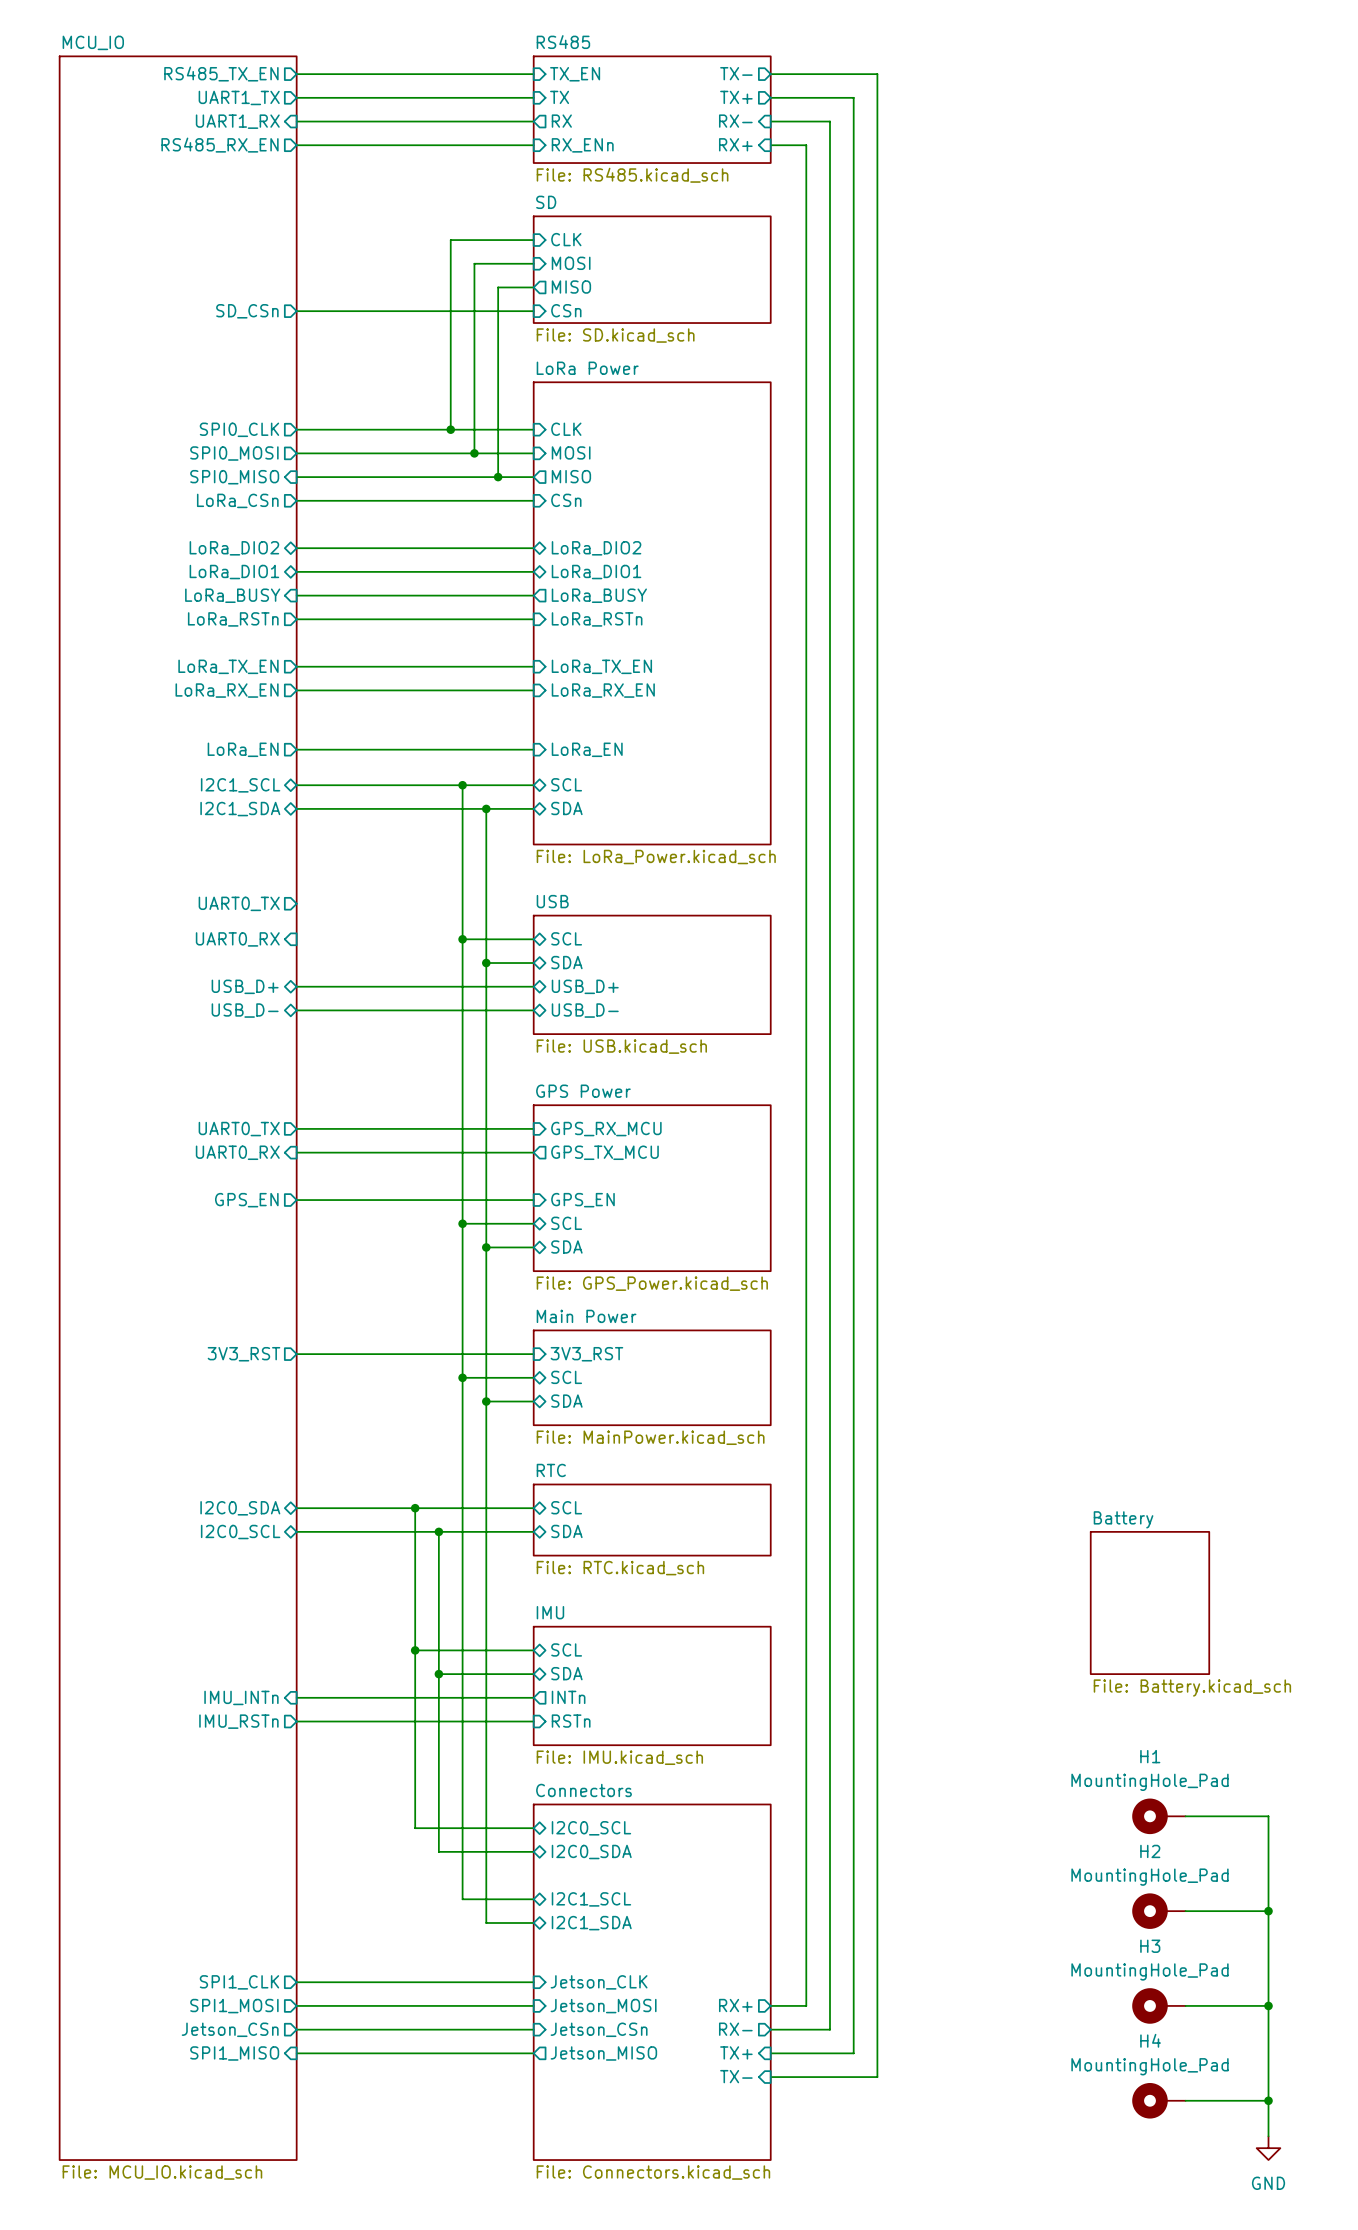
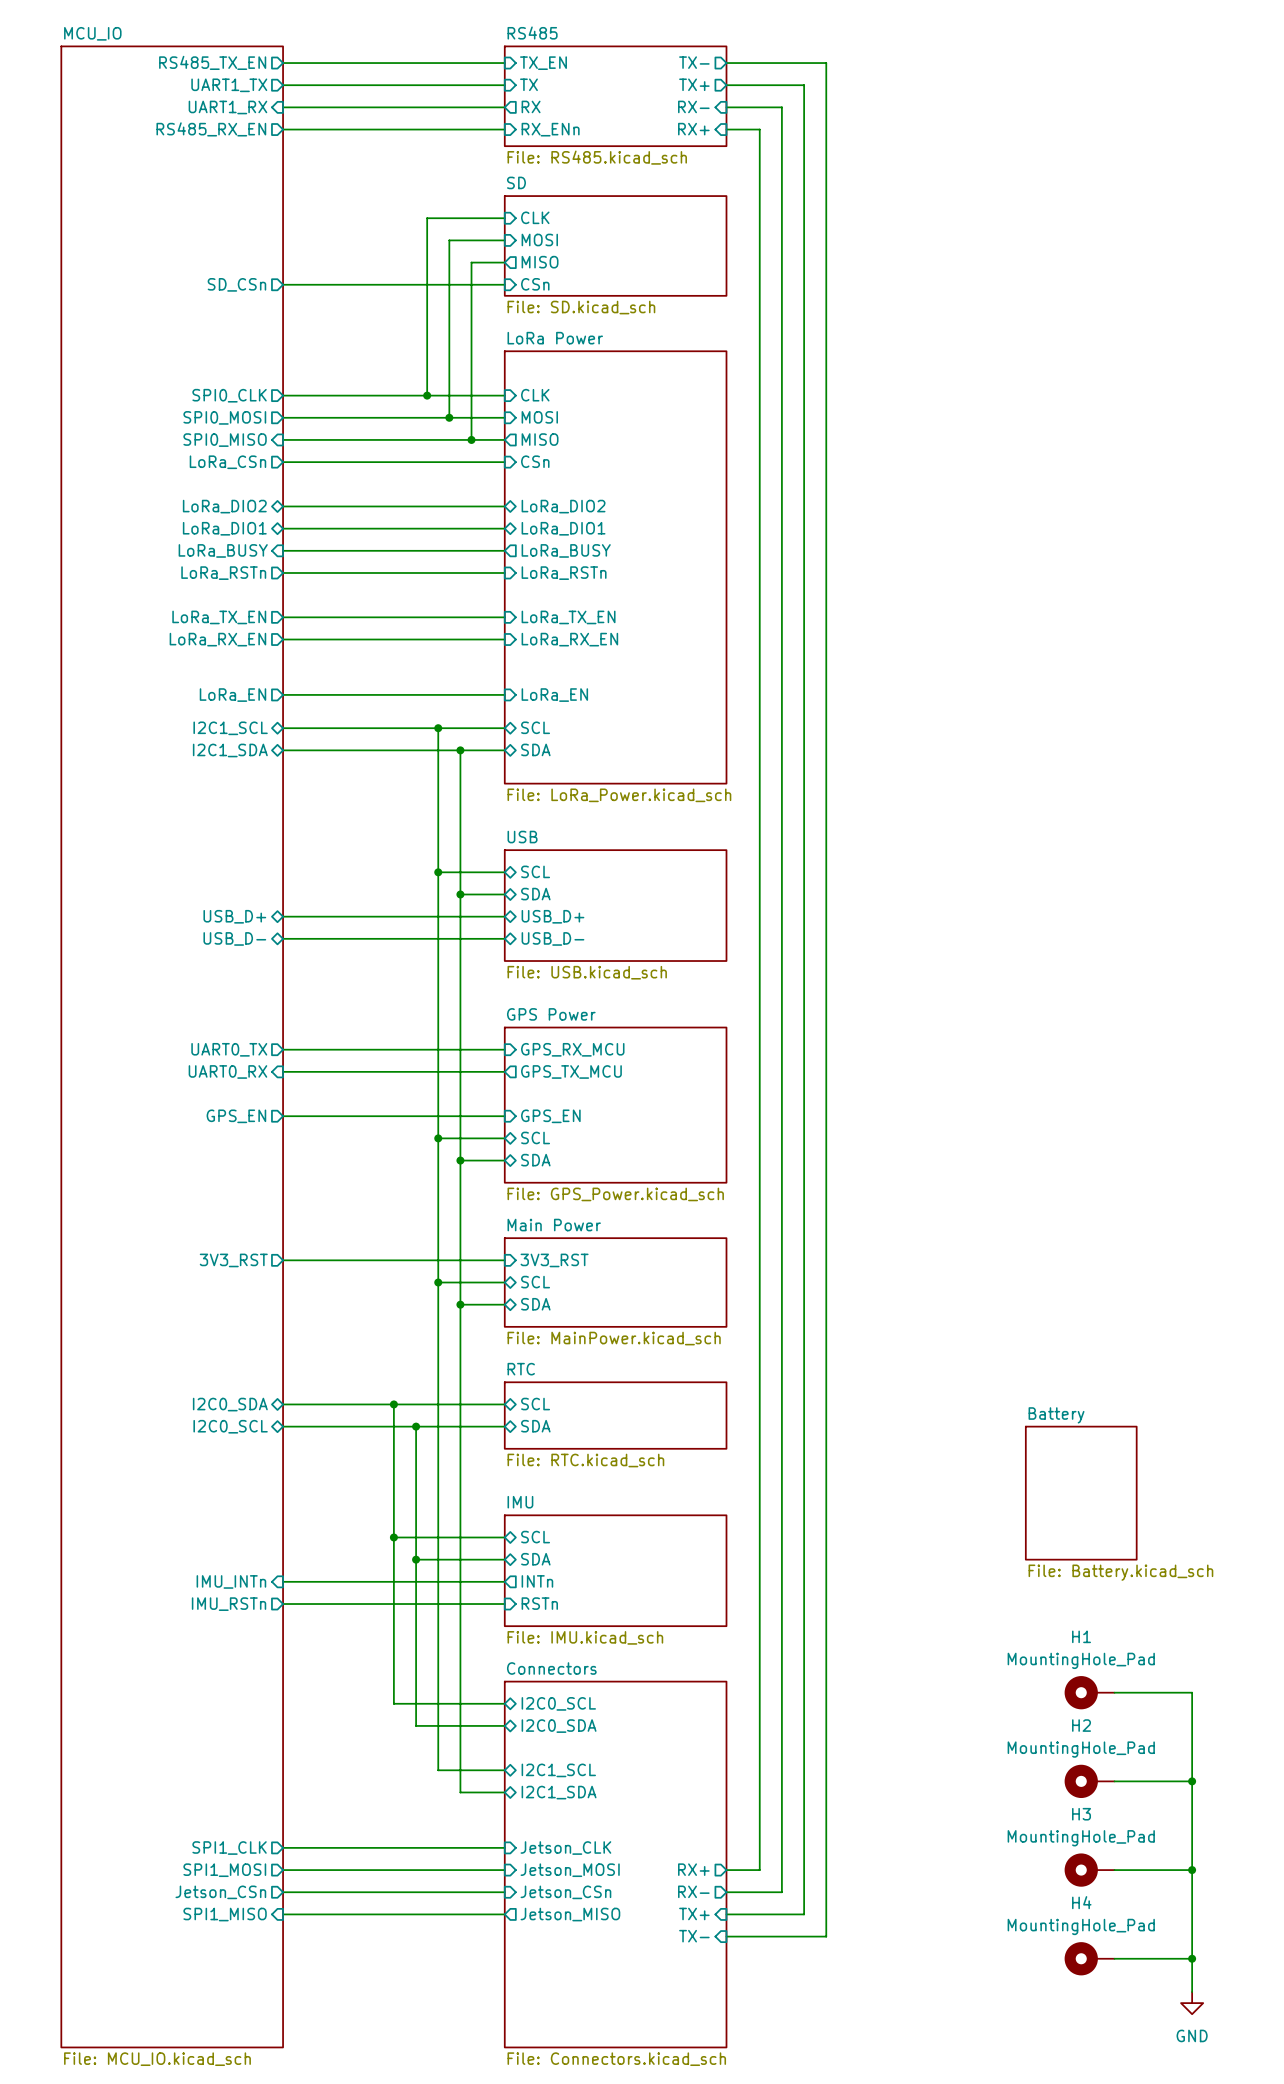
sheet pin: UART0_TX (239, 903) -> none
sheet pin: UART0_RX (237, 939) -> none
sheet MCU_IO: File: MCU_IO.kicad_sch (178, 1108) -> none
sheet MCU_IO: none -> File: MCU_IO.kicad_sch (172, 1046)
sheet Connectors: File: Connectors.kicad_sch (652, 1982) -> none
sheet Connectors: none -> File: Connectors.kicad_sch (615, 1864)

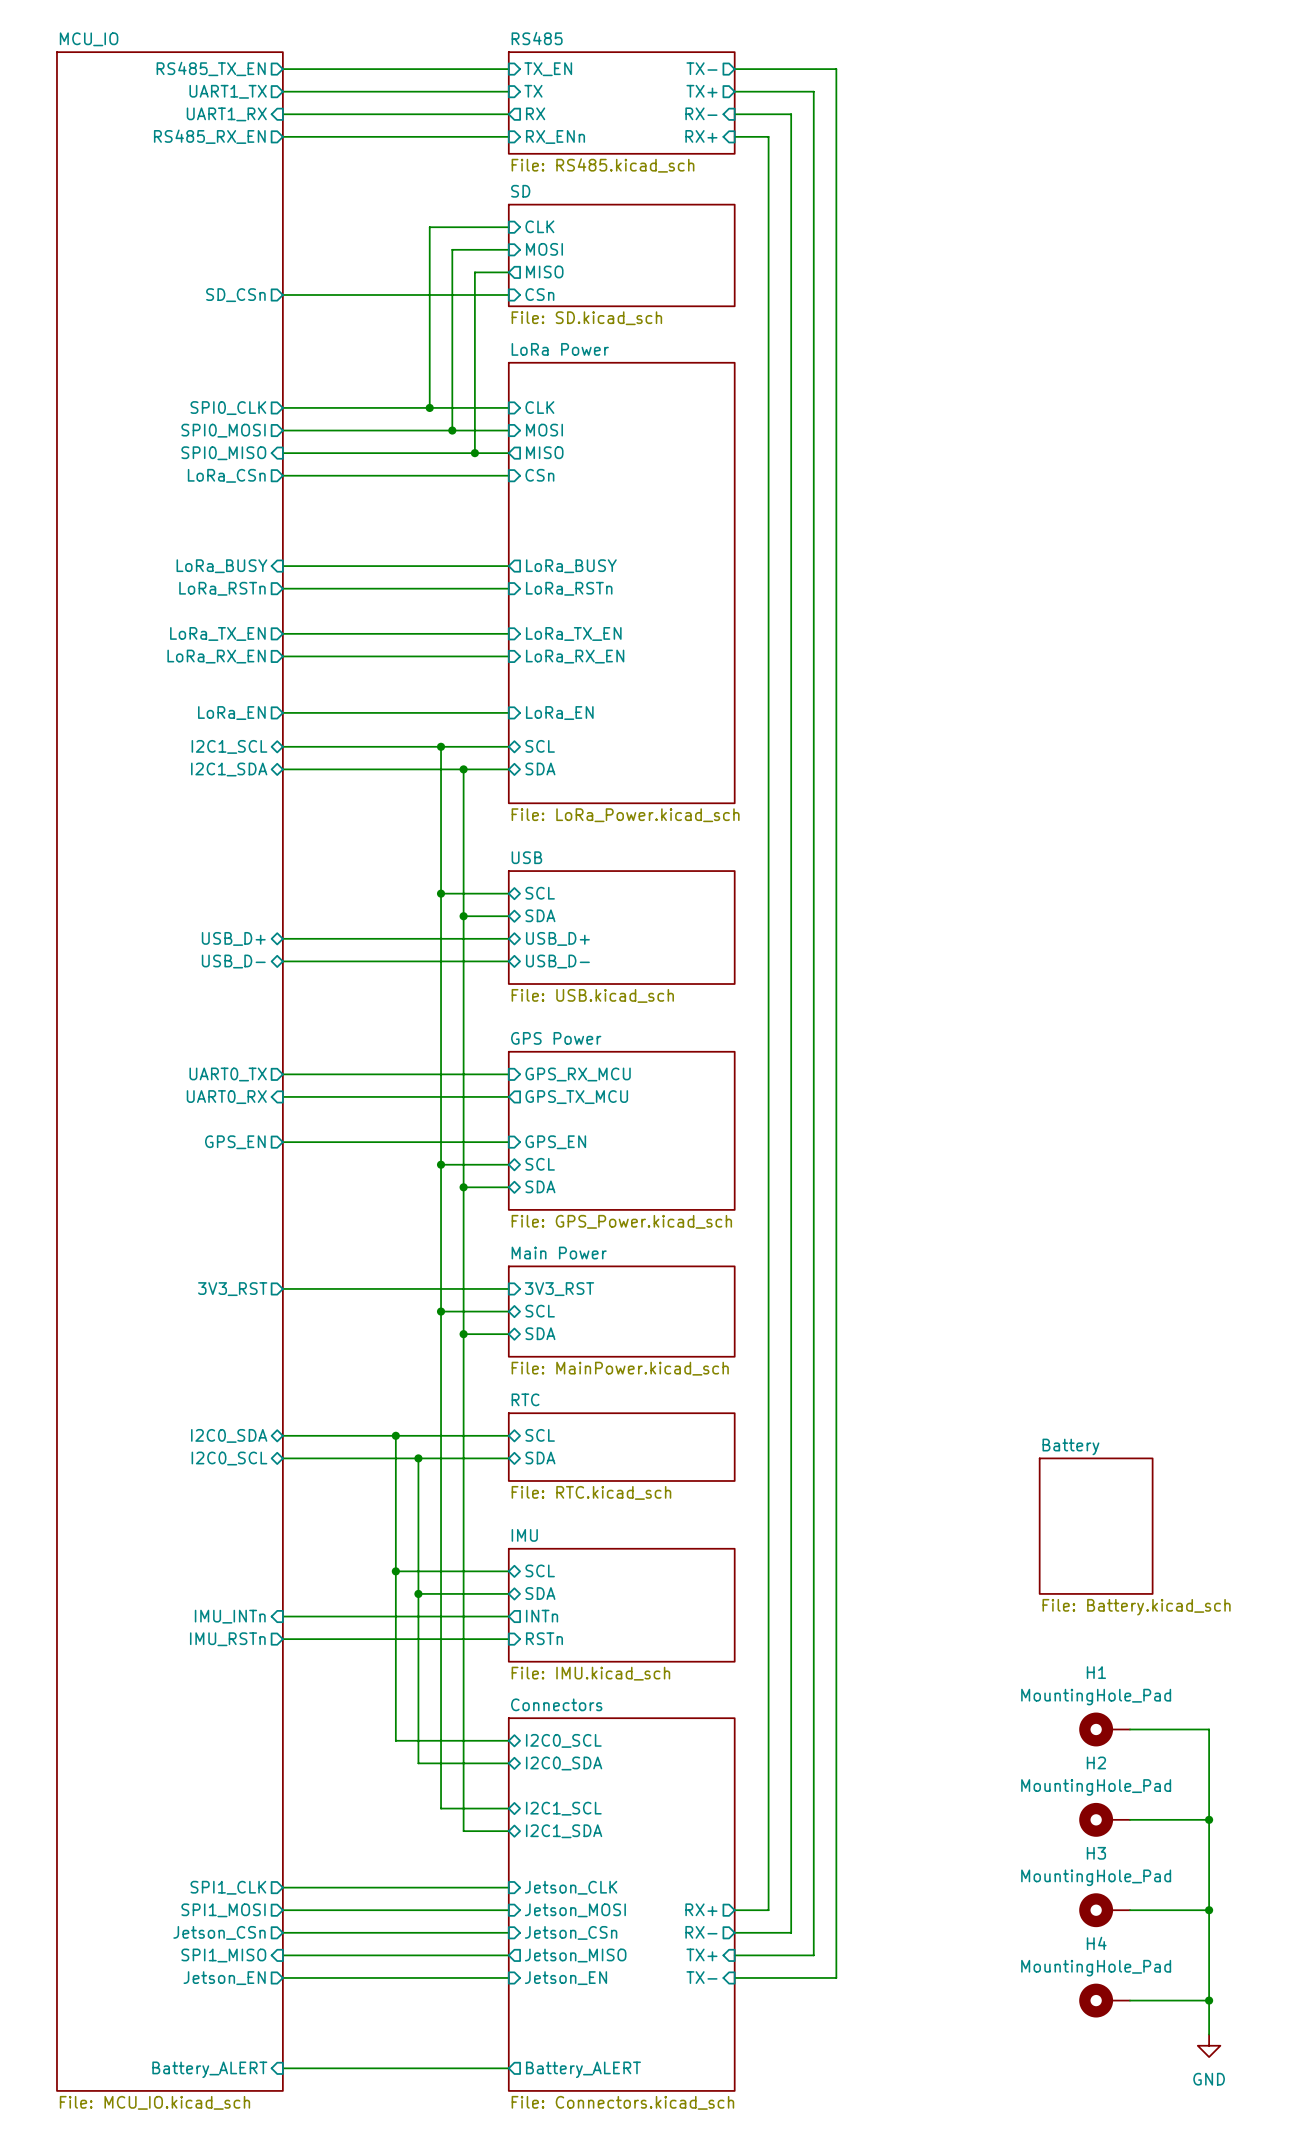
sheet pin: LoRa_DIO2 (224, 506) -> none
wire: (283, 506) (504, 506) -> none
sheet pin: LoRa_DIO2 (563, 506) -> none
sheet pin: LoRa_DIO1 (224, 528) -> none
wire: (283, 528) (504, 528) -> none
sheet pin: LoRa_DIO1 (563, 528) -> none
sheet pin: none -> Jetson_EN (224, 1978)
wire: none -> (282, 1977) (508, 1977)
sheet pin: none -> Jetson_EN (565, 1978)
wire: none -> (282, 2068) (508, 2068)
sheet pin: none -> Battery_ALERT (209, 2069)
sheet pin: none -> Battery_ALERT (583, 2069)

